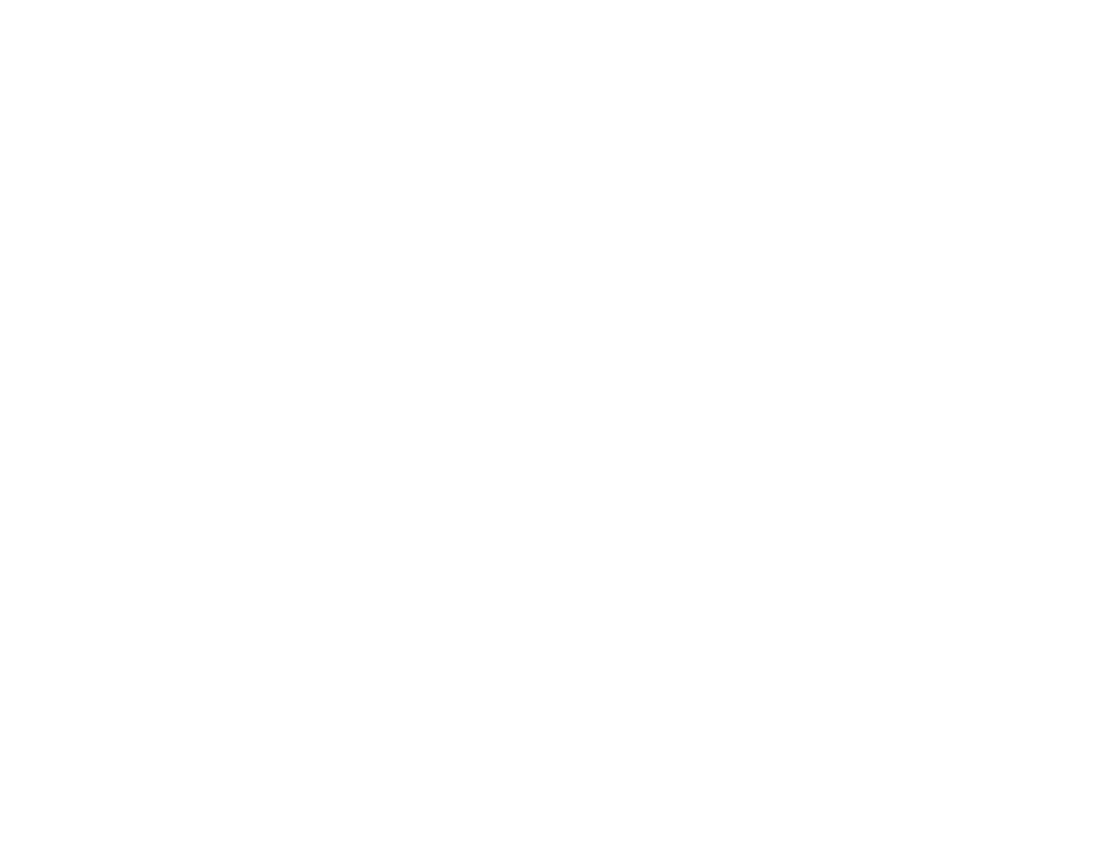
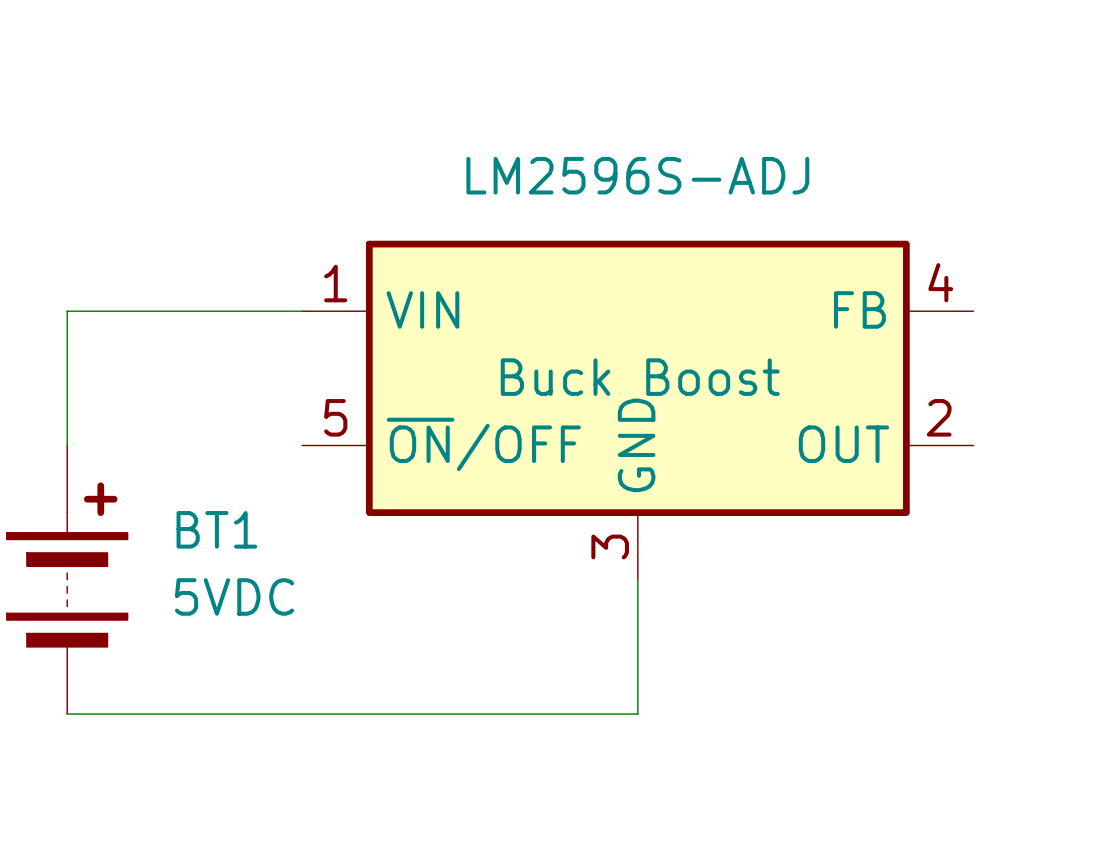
wire: none -> (302, 311) (67, 311) (67, 445)
part: none -> LM2596S-ADJ (637, 410)
BT1: none -> 5VDC (67, 579)
wire: none -> (637, 579) (637, 714) (67, 714)

